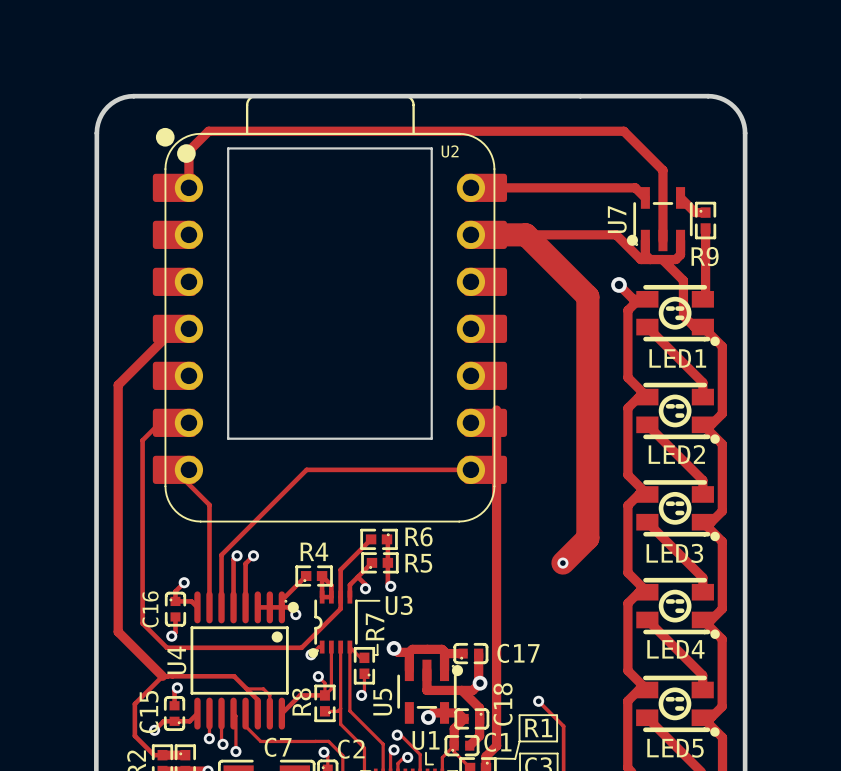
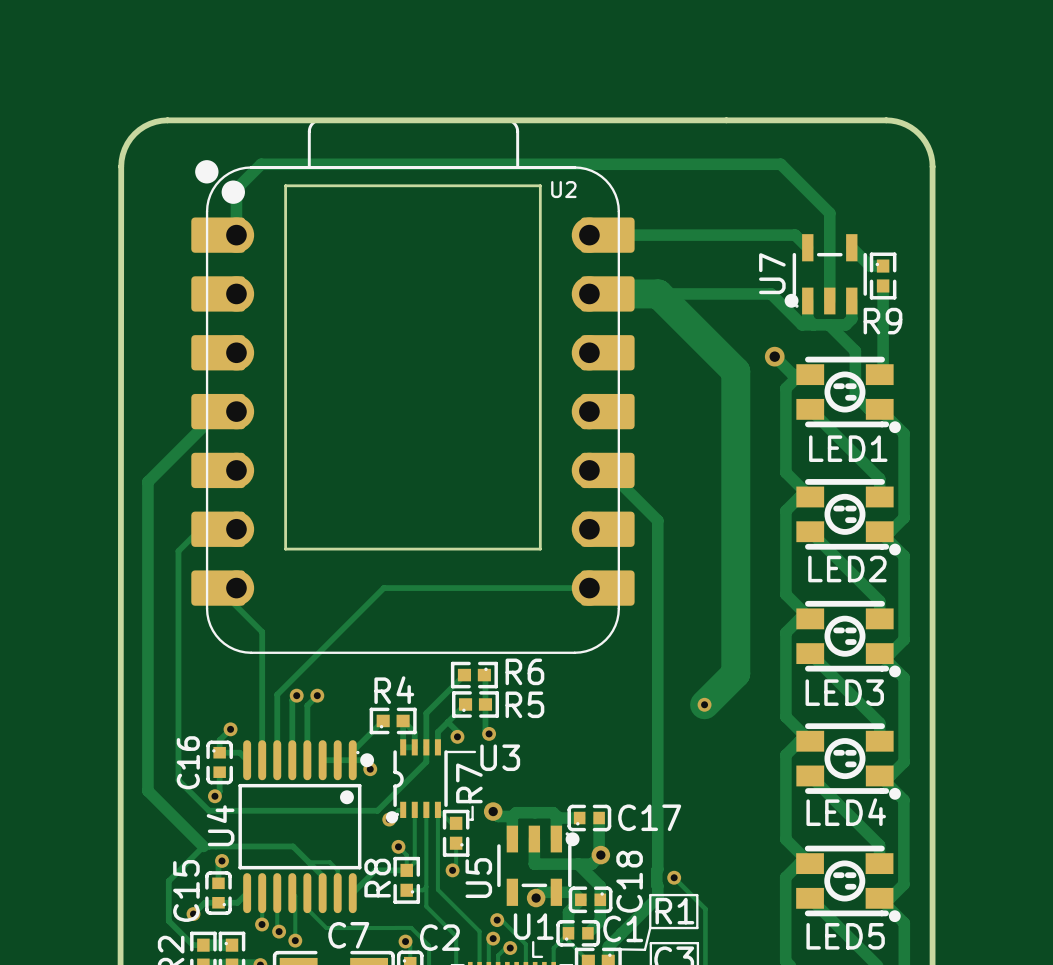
track: (496, 410) (496, 745) -> (607, 470) (657, 520) (657, 897) (621, 933)

